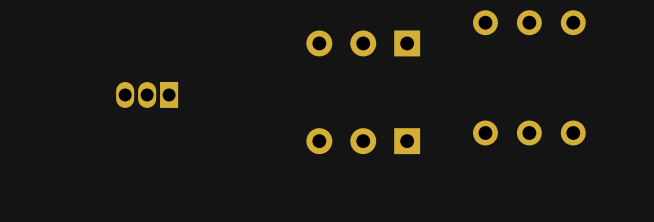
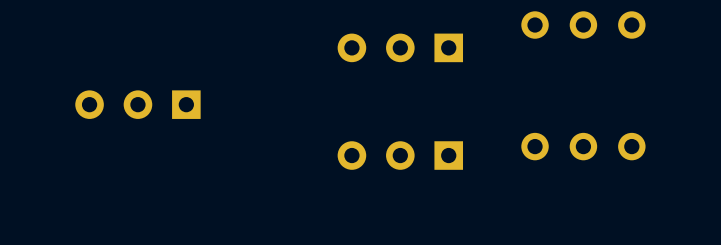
part: none -> (137, 104)
part: (147, 94) -> none

